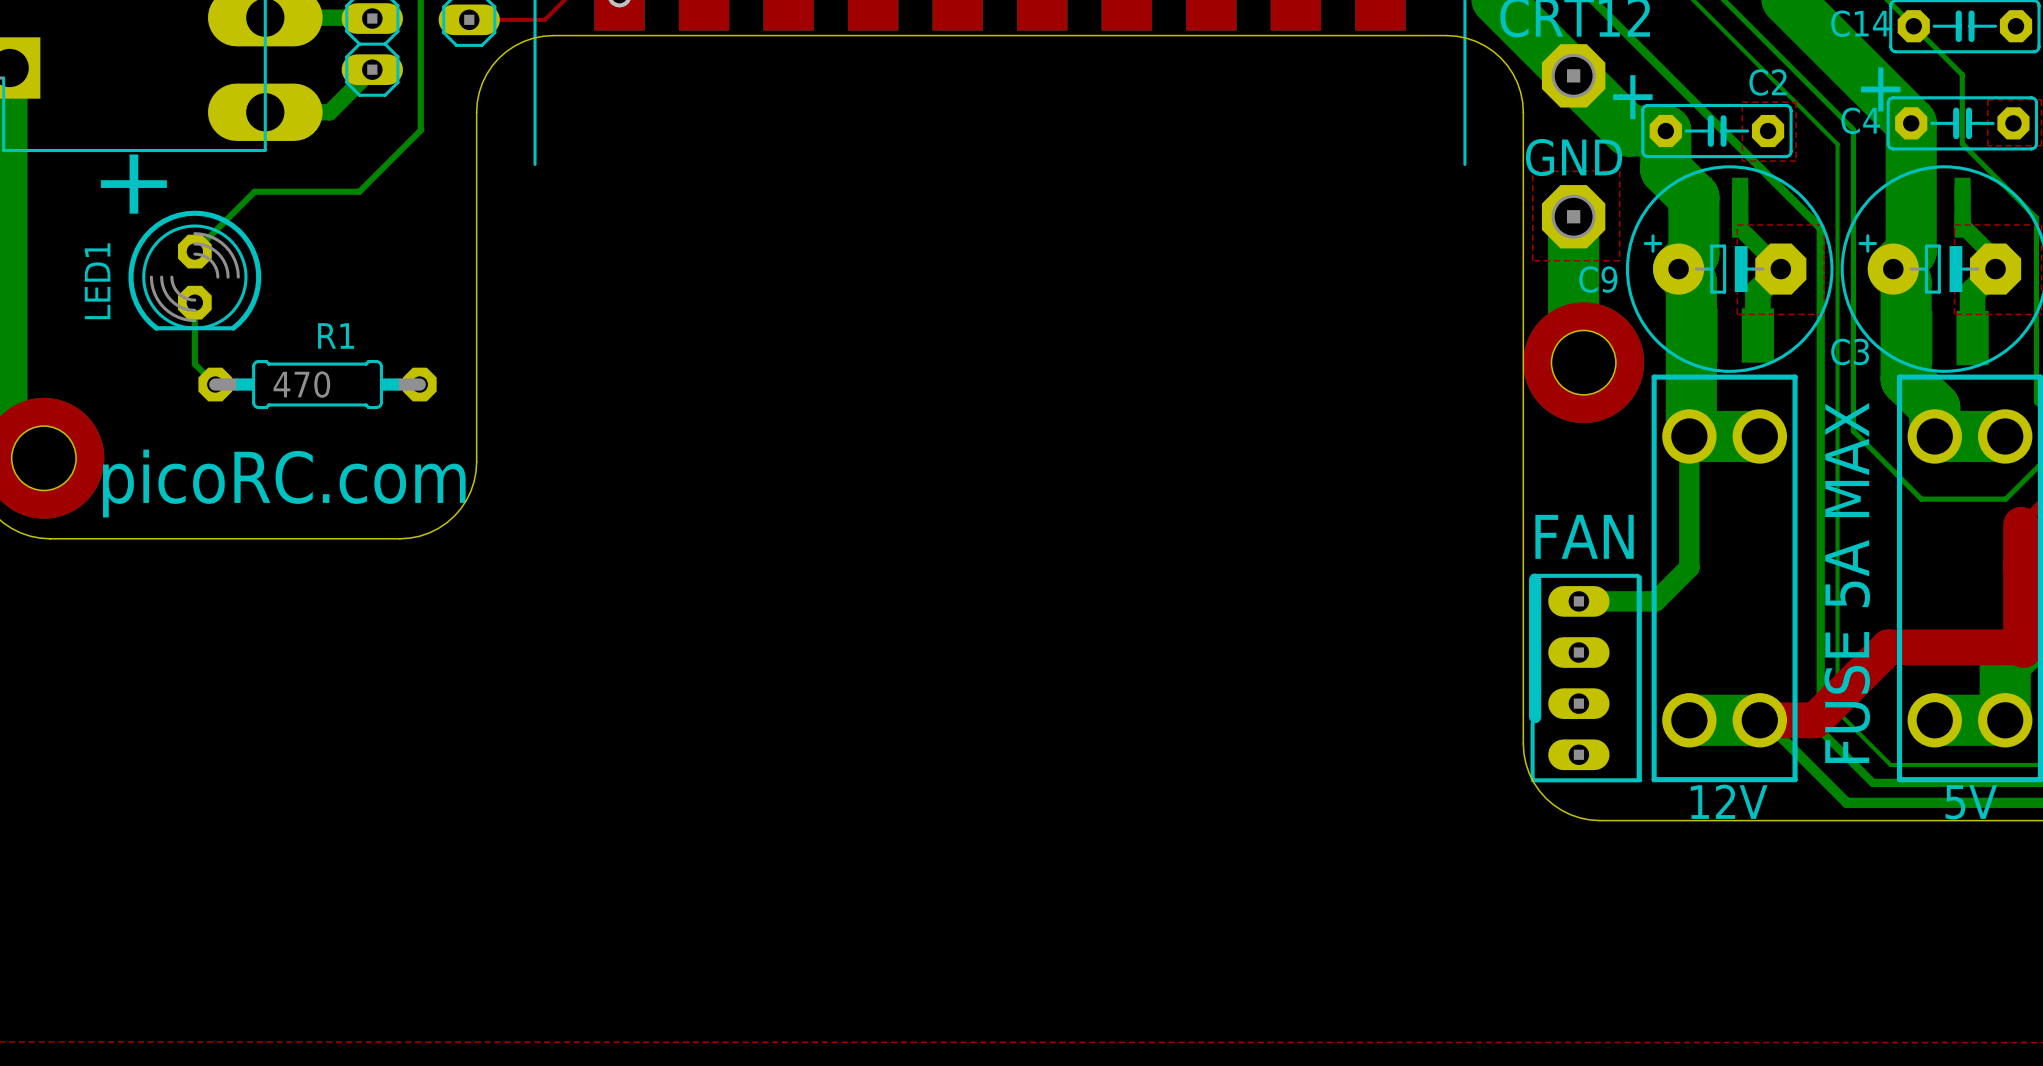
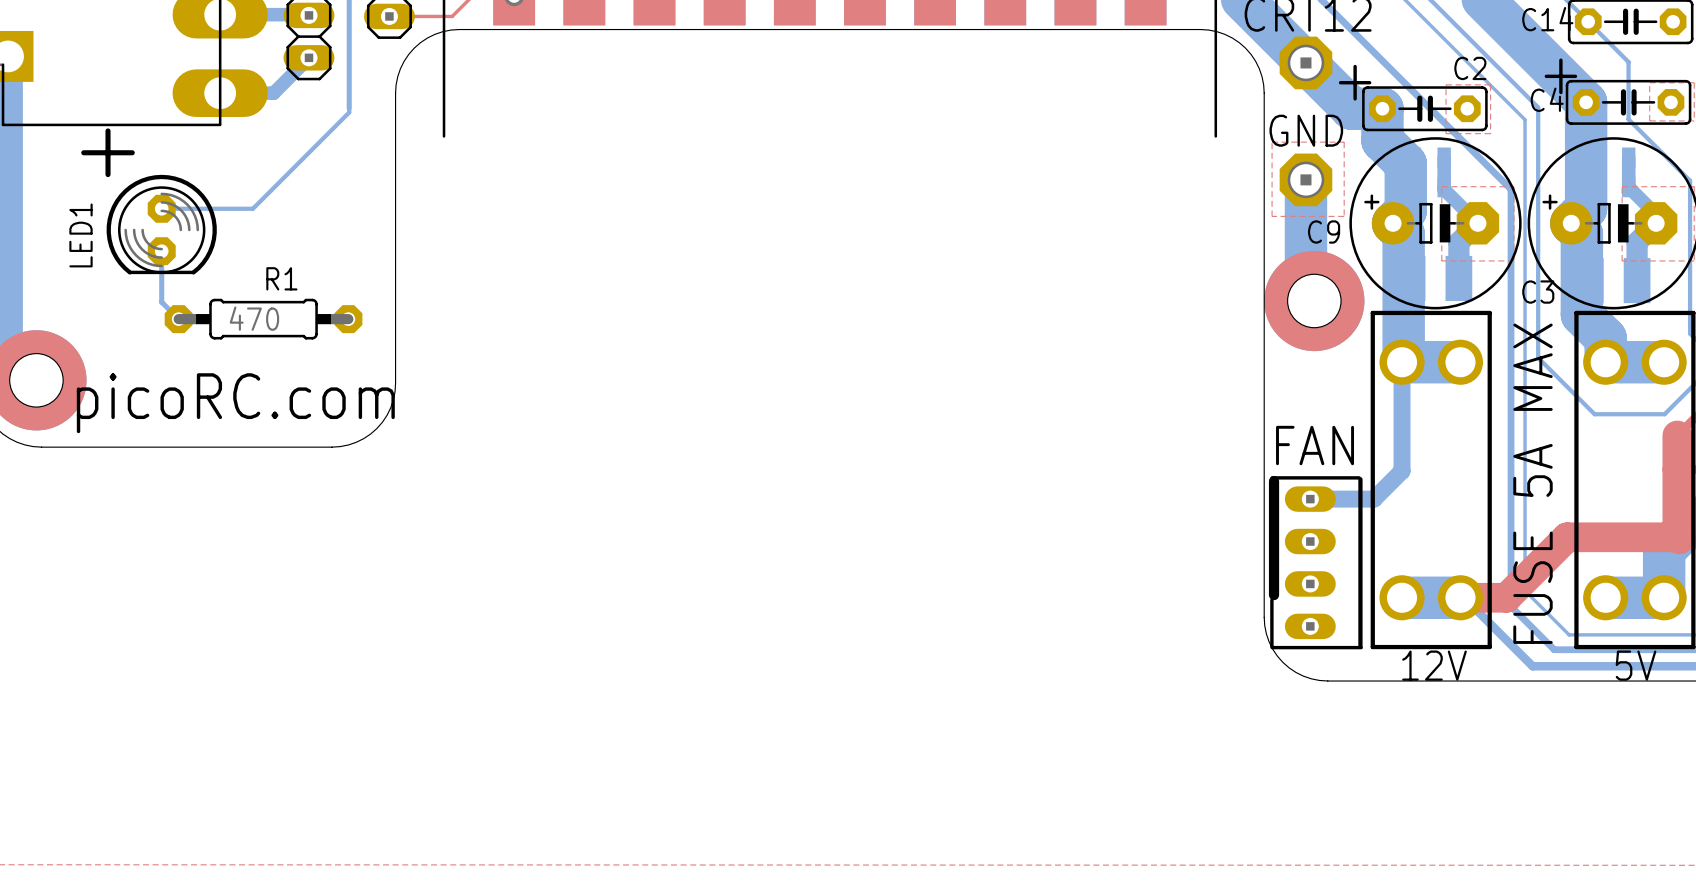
bottom track: (420, 130) (359, 191) (254, 191) (194, 251) -> (349, 108) (349, 112) (252, 208) (161, 208)

